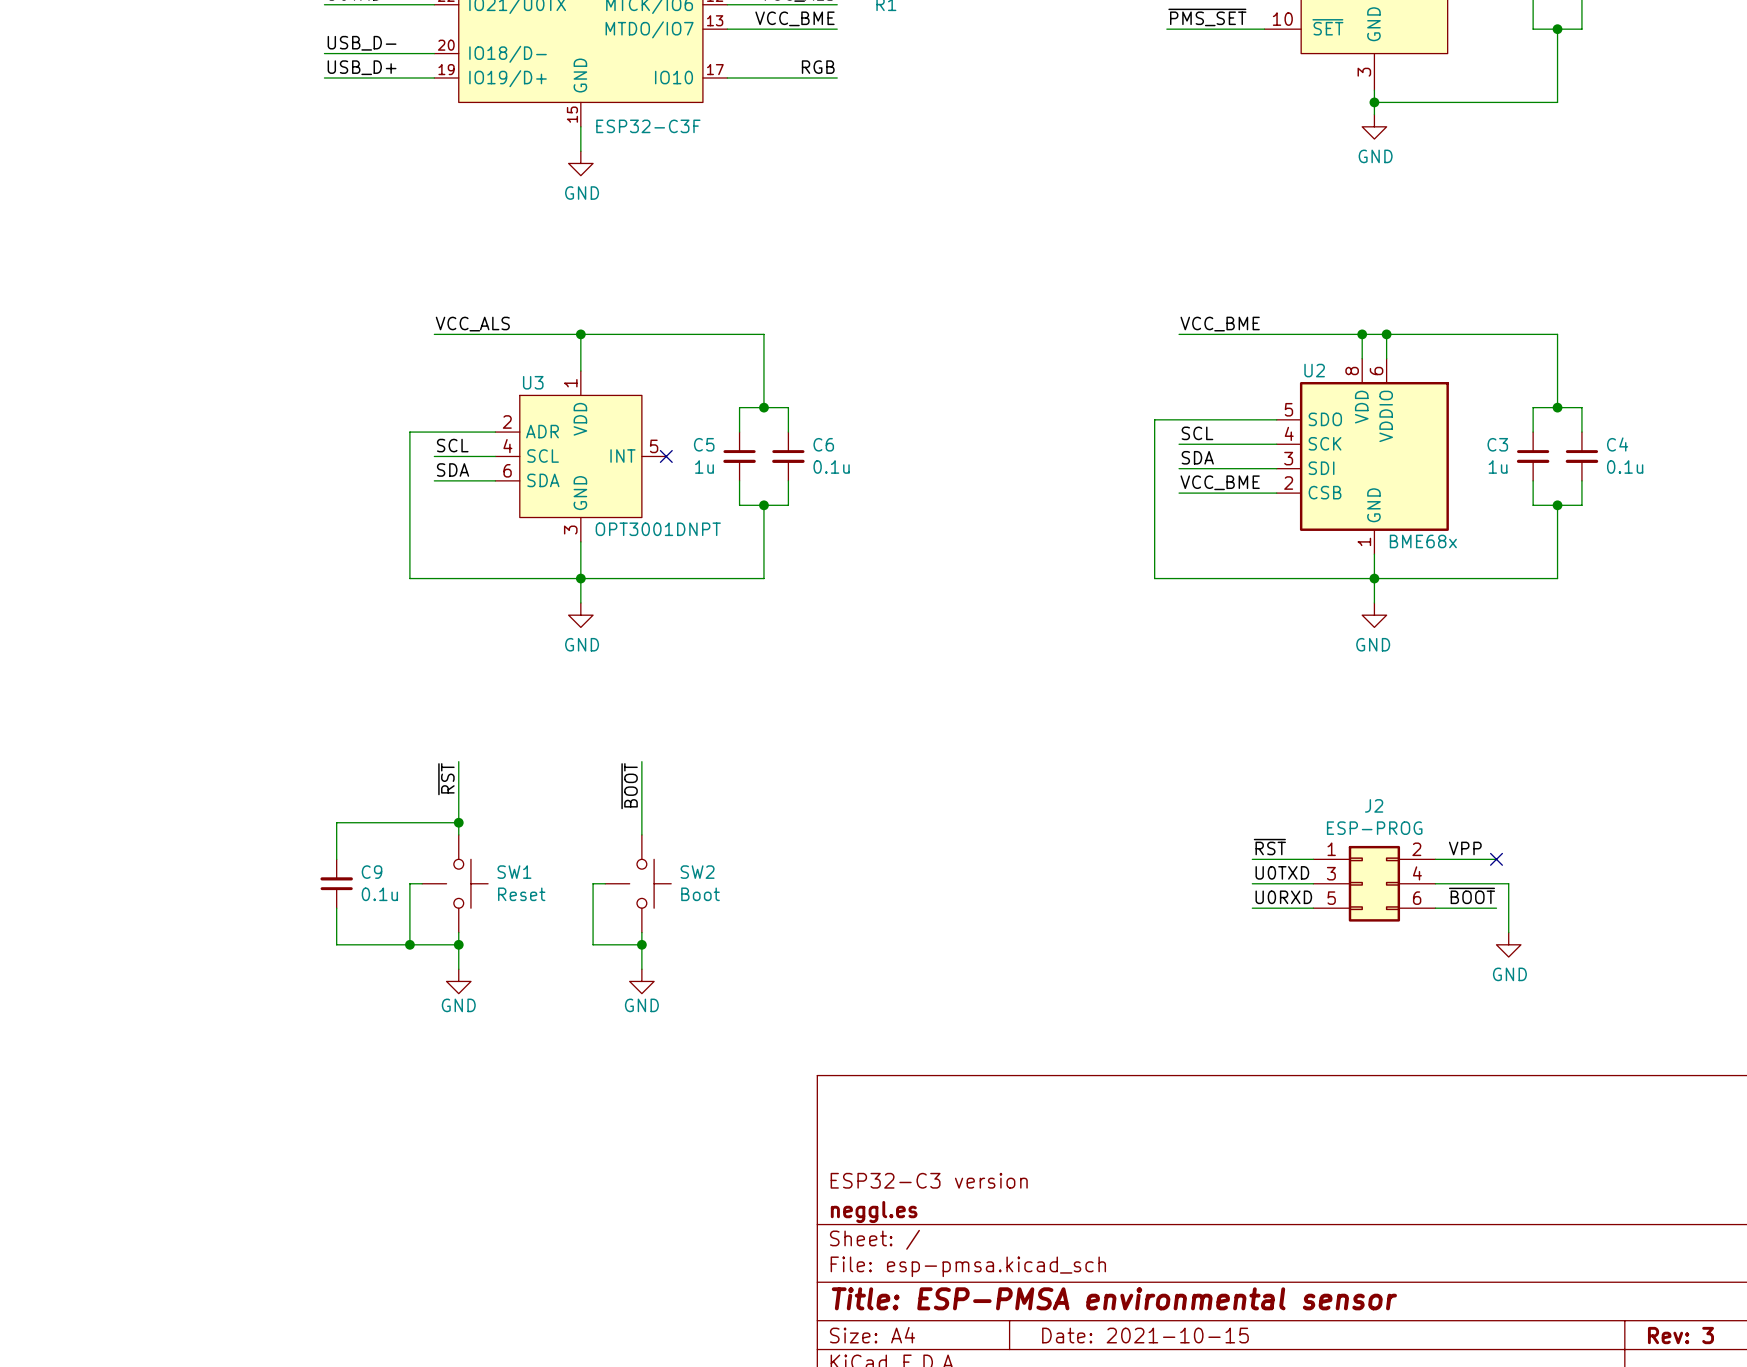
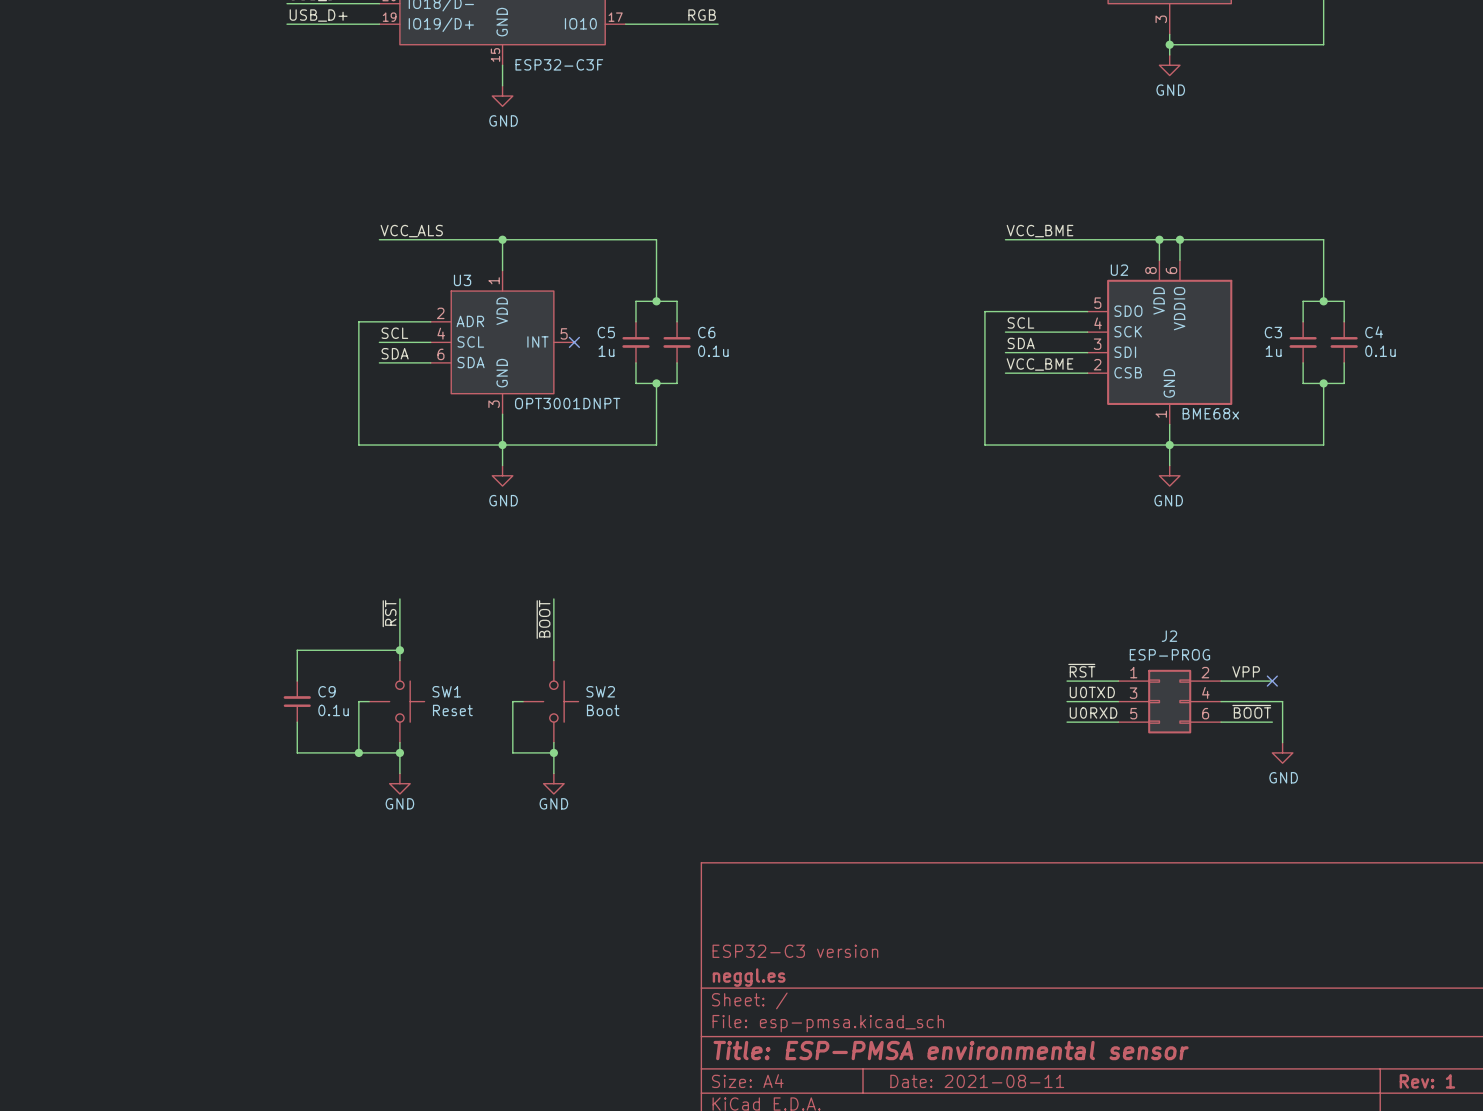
title block: Date: 2021-10-15 (1145, 1335) -> Date: 2021-08-11 (977, 1081)
title block: Rev: 3 (1680, 1335) -> Rev: 1 (1427, 1081)

